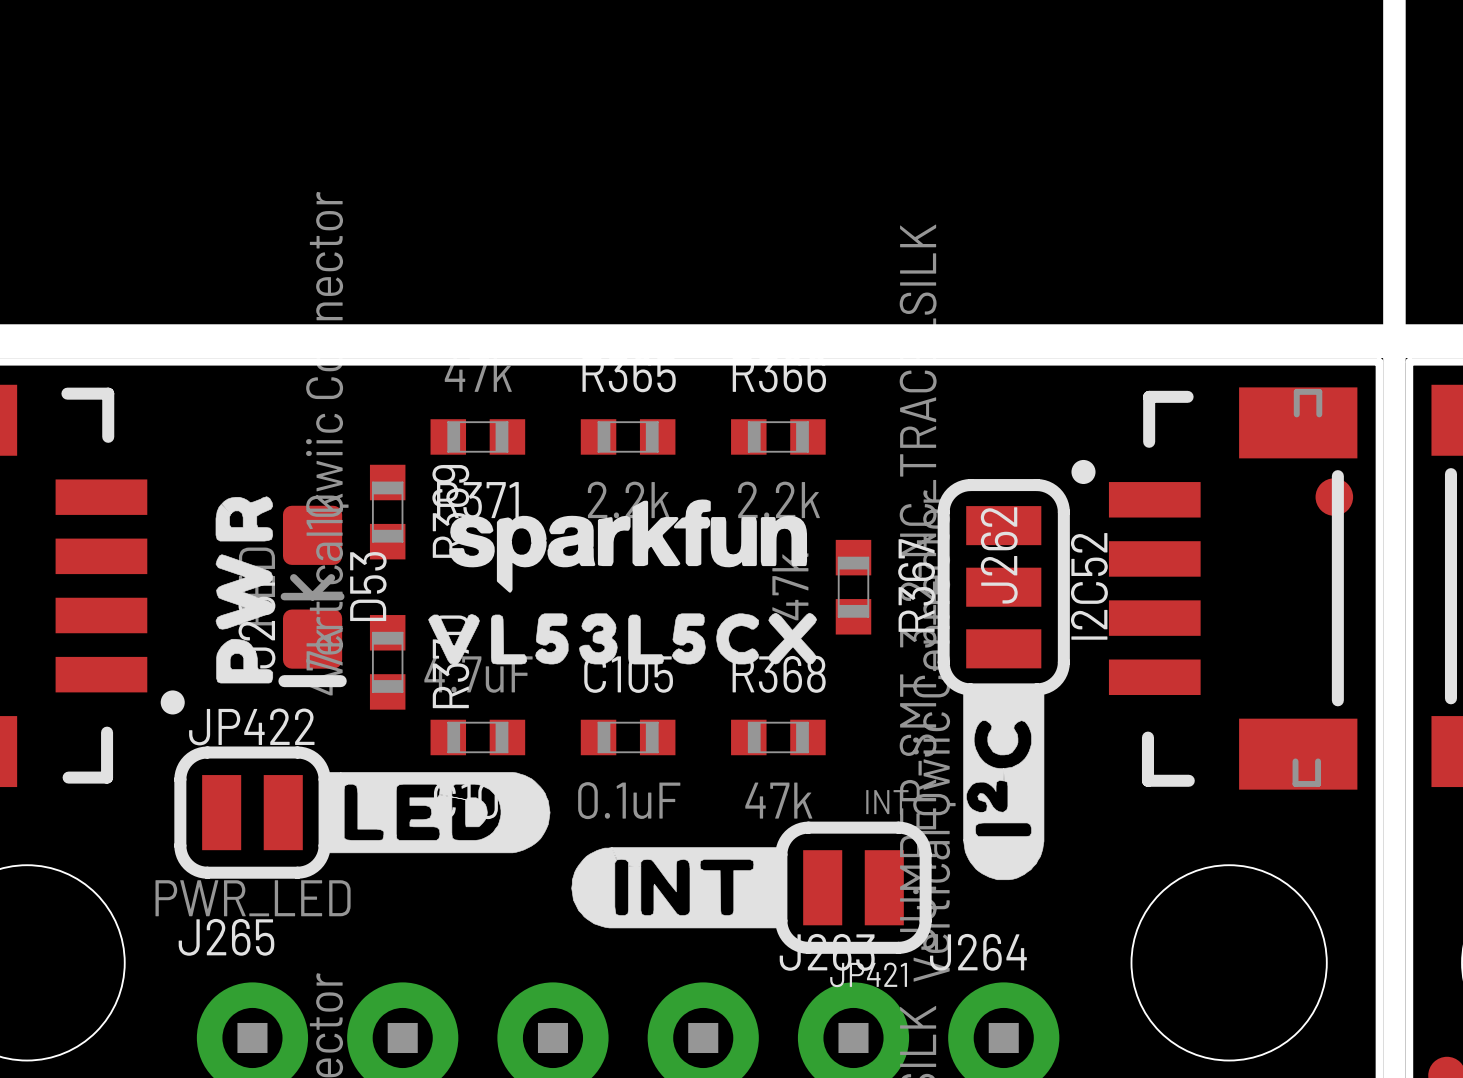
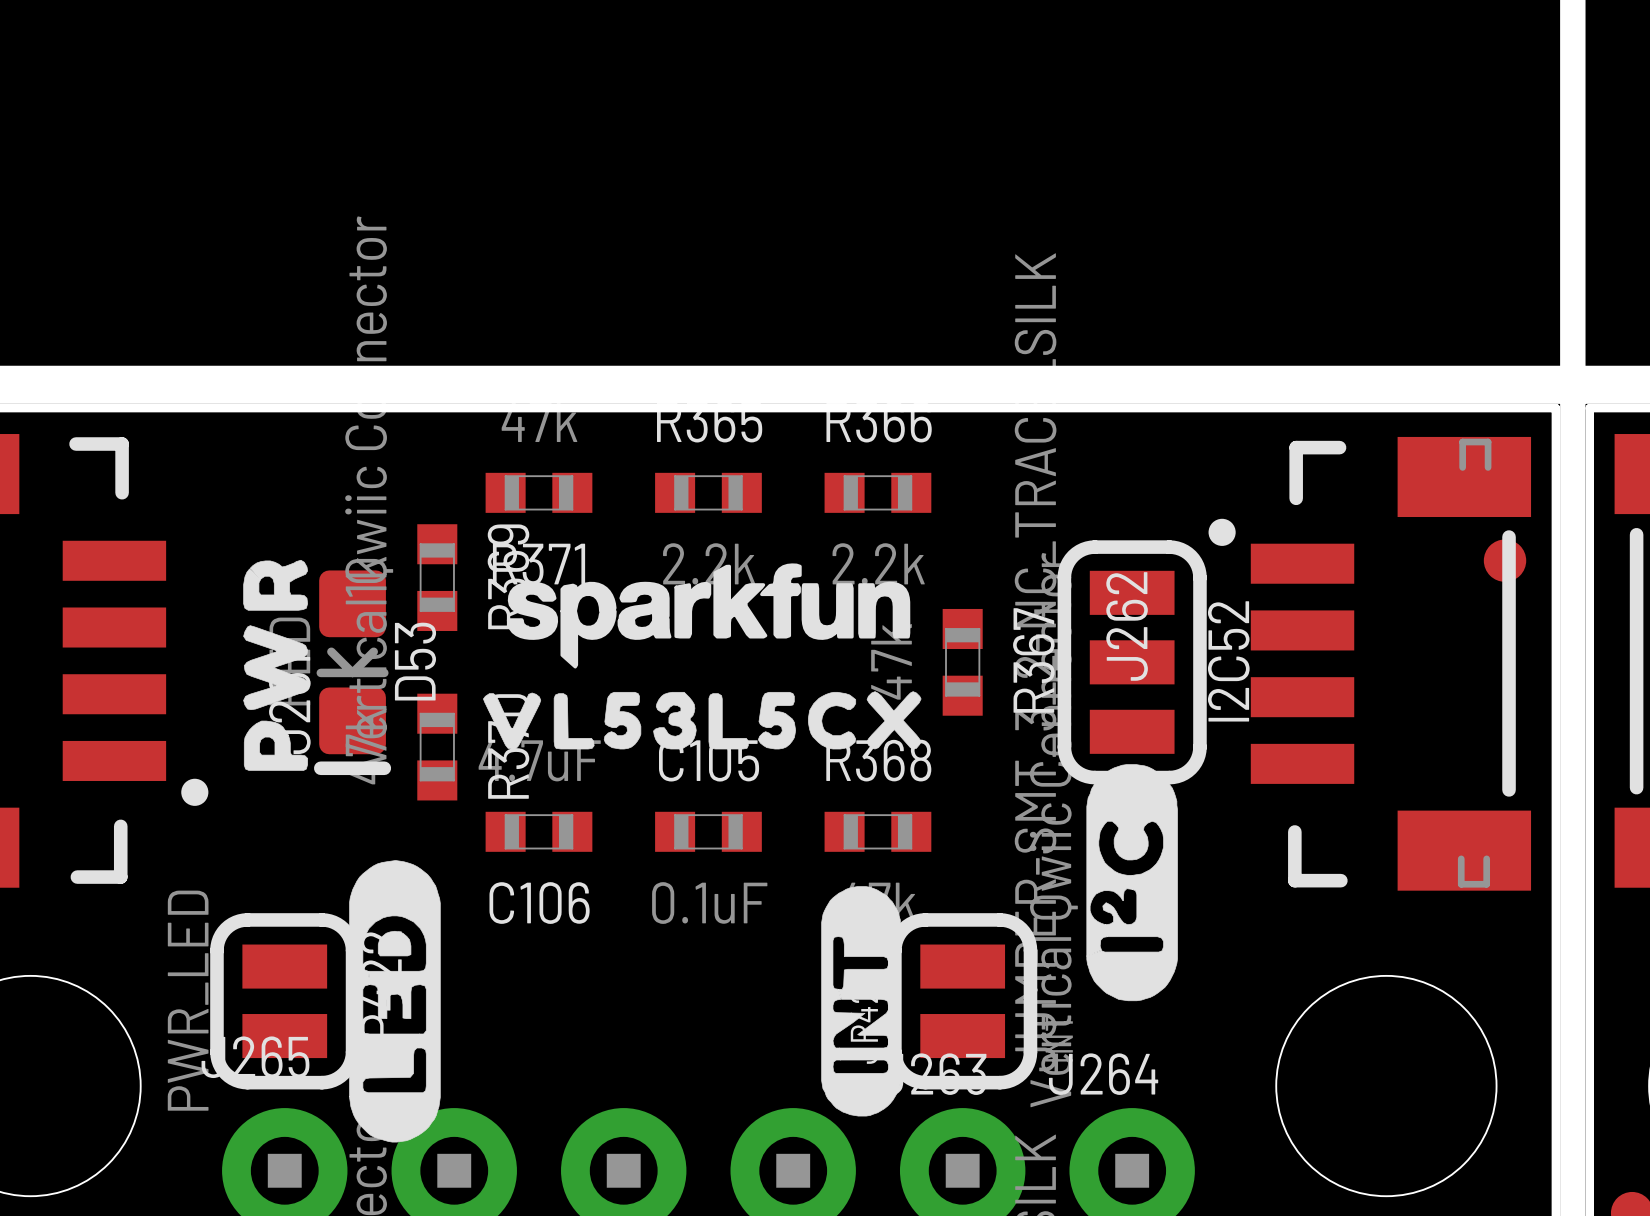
drawing shape: [963, 689, 1045, 881] -> [1086, 764, 1178, 1002]
drawing: none -> [349, 860, 441, 1143]
drawing: [320, 772, 785, 929] -> none
drawing: none -> [821, 886, 901, 1117]
JP422 rotation: 0° (252, 812) -> 90° clockwise (284, 1001)
JP421 rotation: 0° (853, 887) -> 90° clockwise (962, 1001)

